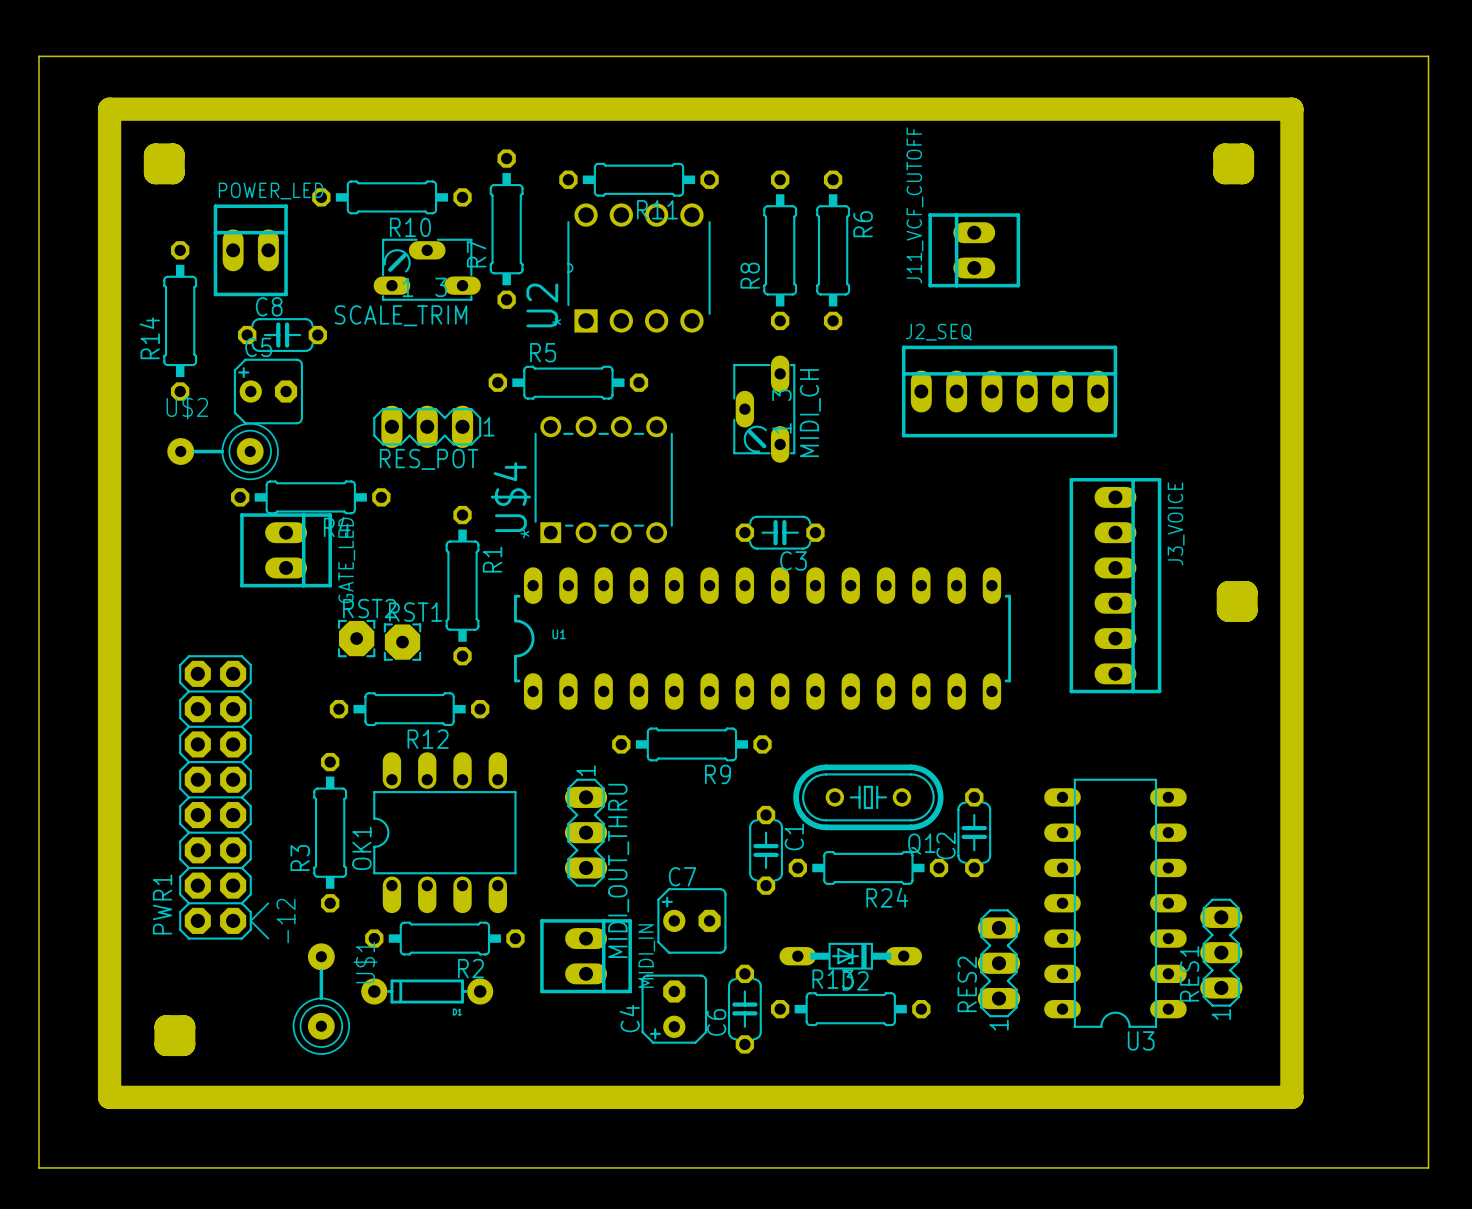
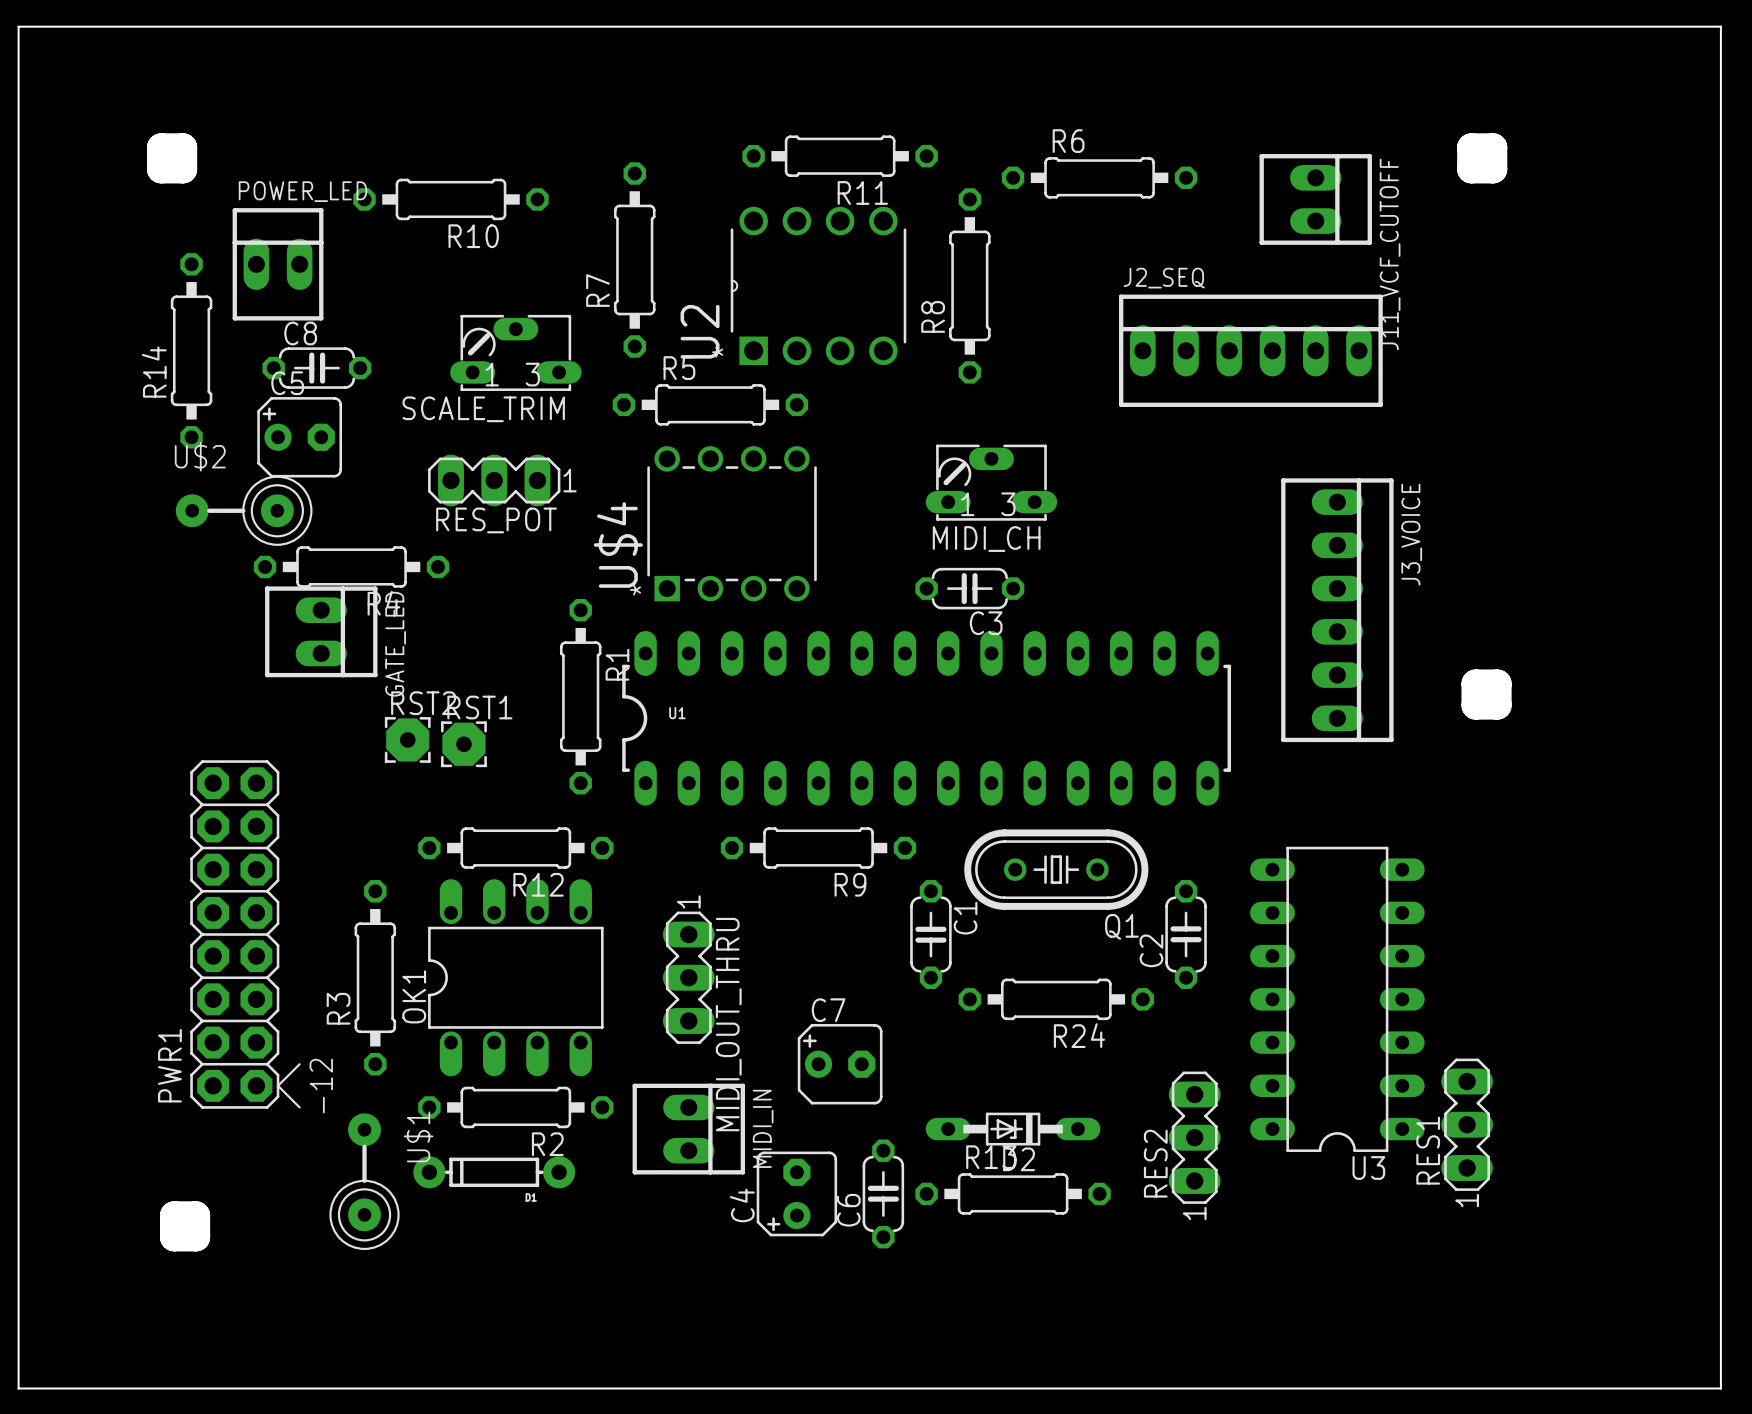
board edge: (109, 109) (109, 1097) (1291, 1097) (1291, 109) (109, 109) -> none
R11 position: (638, 179) -> (840, 156)
R6 name position: R6 (863, 224) -> R6 (1068, 141)
R7 position: (506, 229) -> (634, 259)
R8 position: (780, 250) -> (969, 285)
R6 rotation: 0° (833, 250) -> 90° clockwise (1099, 177)
R6 position: (833, 250) -> (1099, 177)
J11_VCF_CUTOFF rotation: 0° (974, 250) -> 180° (1315, 199)
J11_VCF_CUTOFF position: (974, 250) -> (1315, 199)
U2 position: (638, 267) -> (818, 285)
SCALE_TRIM position: (427, 269) -> (515, 352)
R5 position: (568, 382) -> (710, 404)
J2_SEQ position: (1009, 391) -> (1250, 350)
MIDI_CH rotation: 0° (764, 409) -> 90° clockwise (991, 482)
MIDI_CH position: (764, 409) -> (991, 482)
U$4 position: (603, 479) -> (732, 523)
C3 position: (780, 532) -> (969, 588)
R1 position: (462, 585) -> (580, 696)
J3_VOICE position: (1115, 585) -> (1337, 610)
U1 position: (762, 638) -> (926, 718)
R12 position: (409, 709) -> (515, 848)
R9 position: (691, 744) -> (818, 848)
Q1 position: (868, 797) -> (1056, 869)
C2 position: (974, 832) -> (1186, 934)
C1 position: (766, 850) -> (930, 934)
R24 position: (868, 867) -> (1056, 999)
U3 position: (1115, 903) -> (1337, 999)
C7 position: (691, 920) -> (840, 1064)

